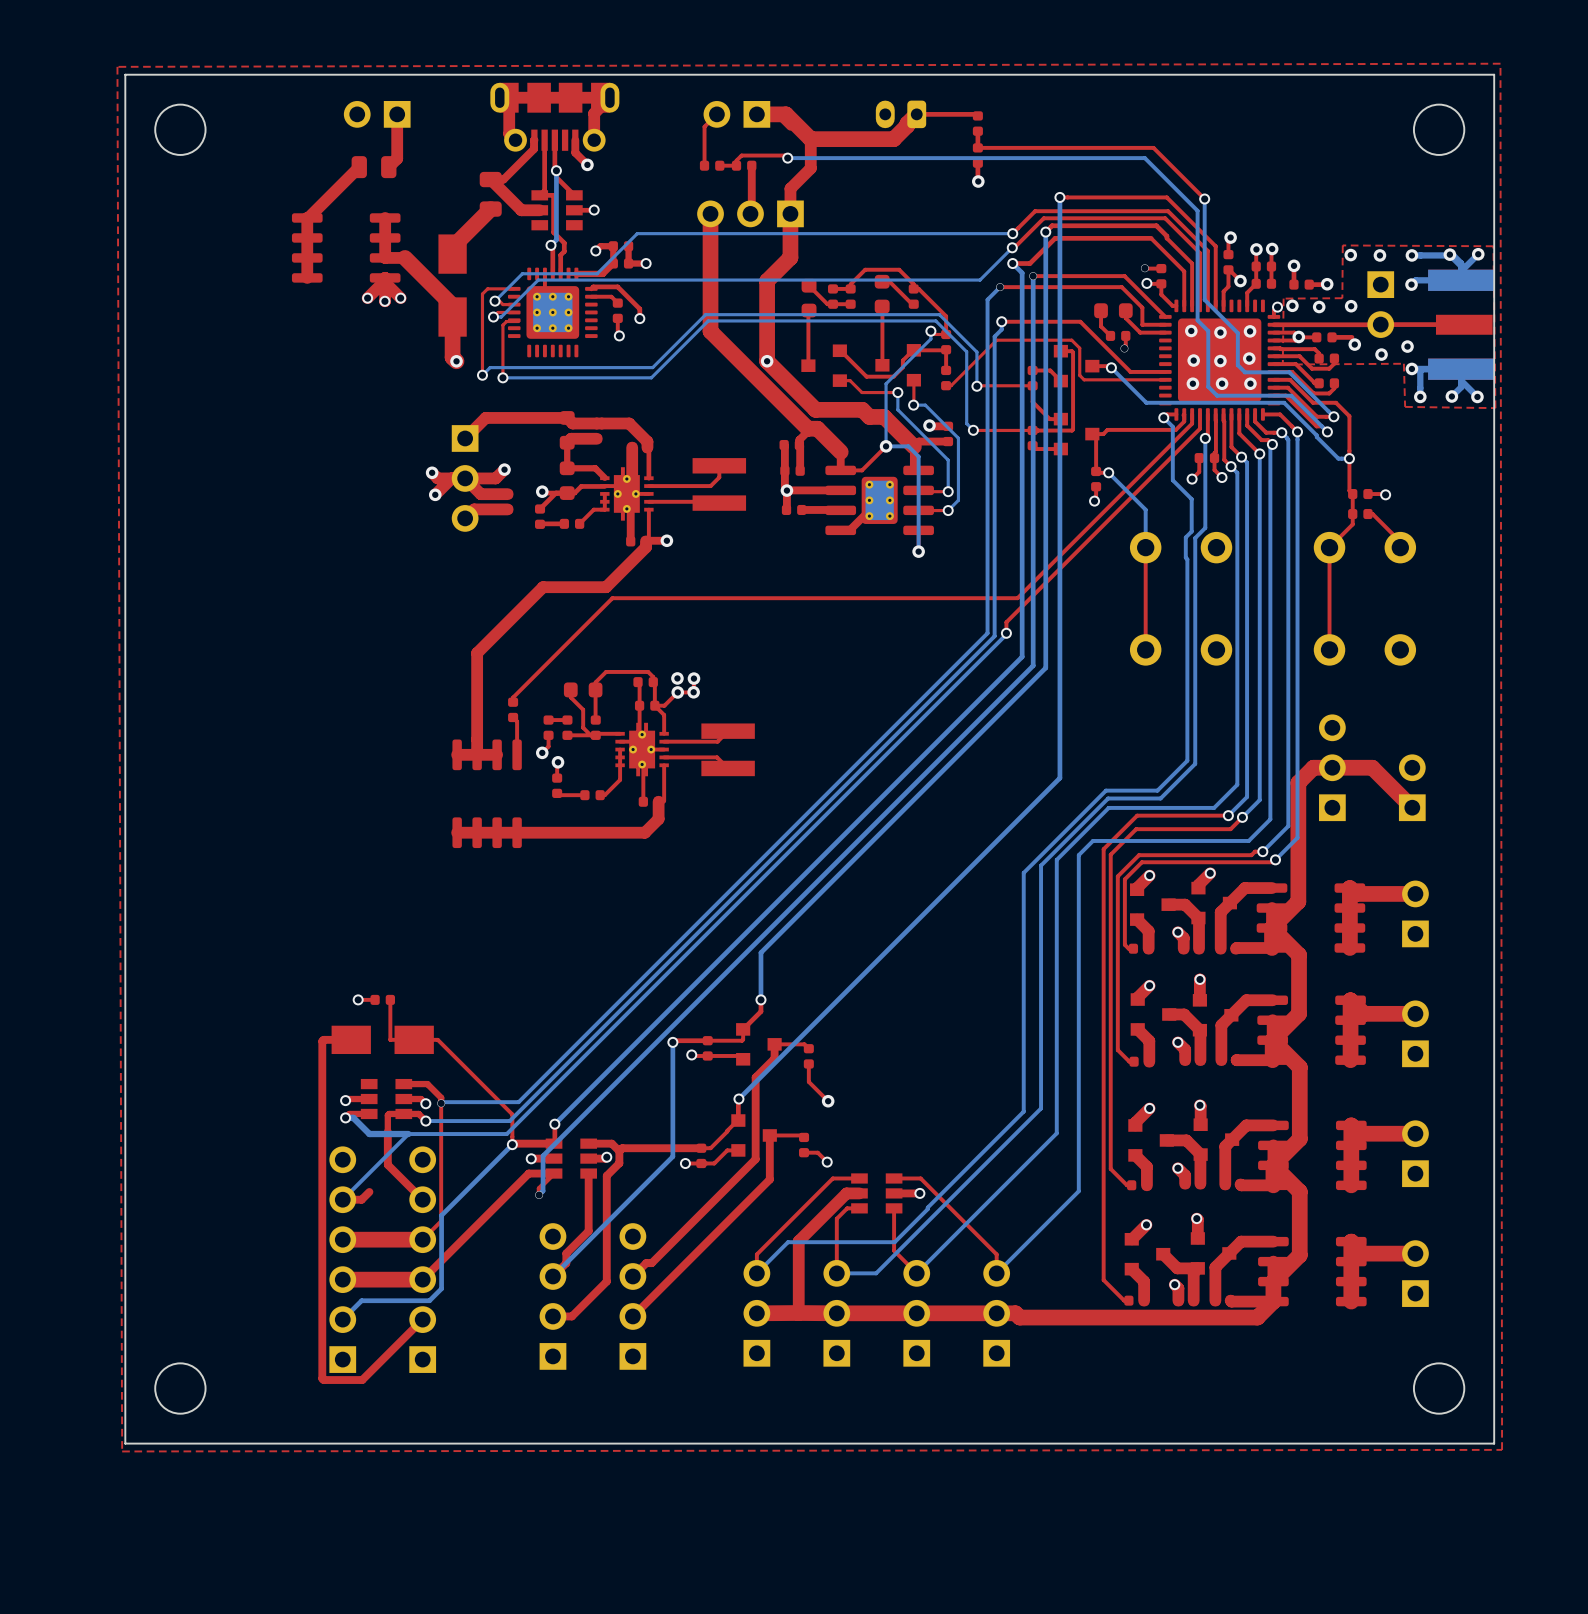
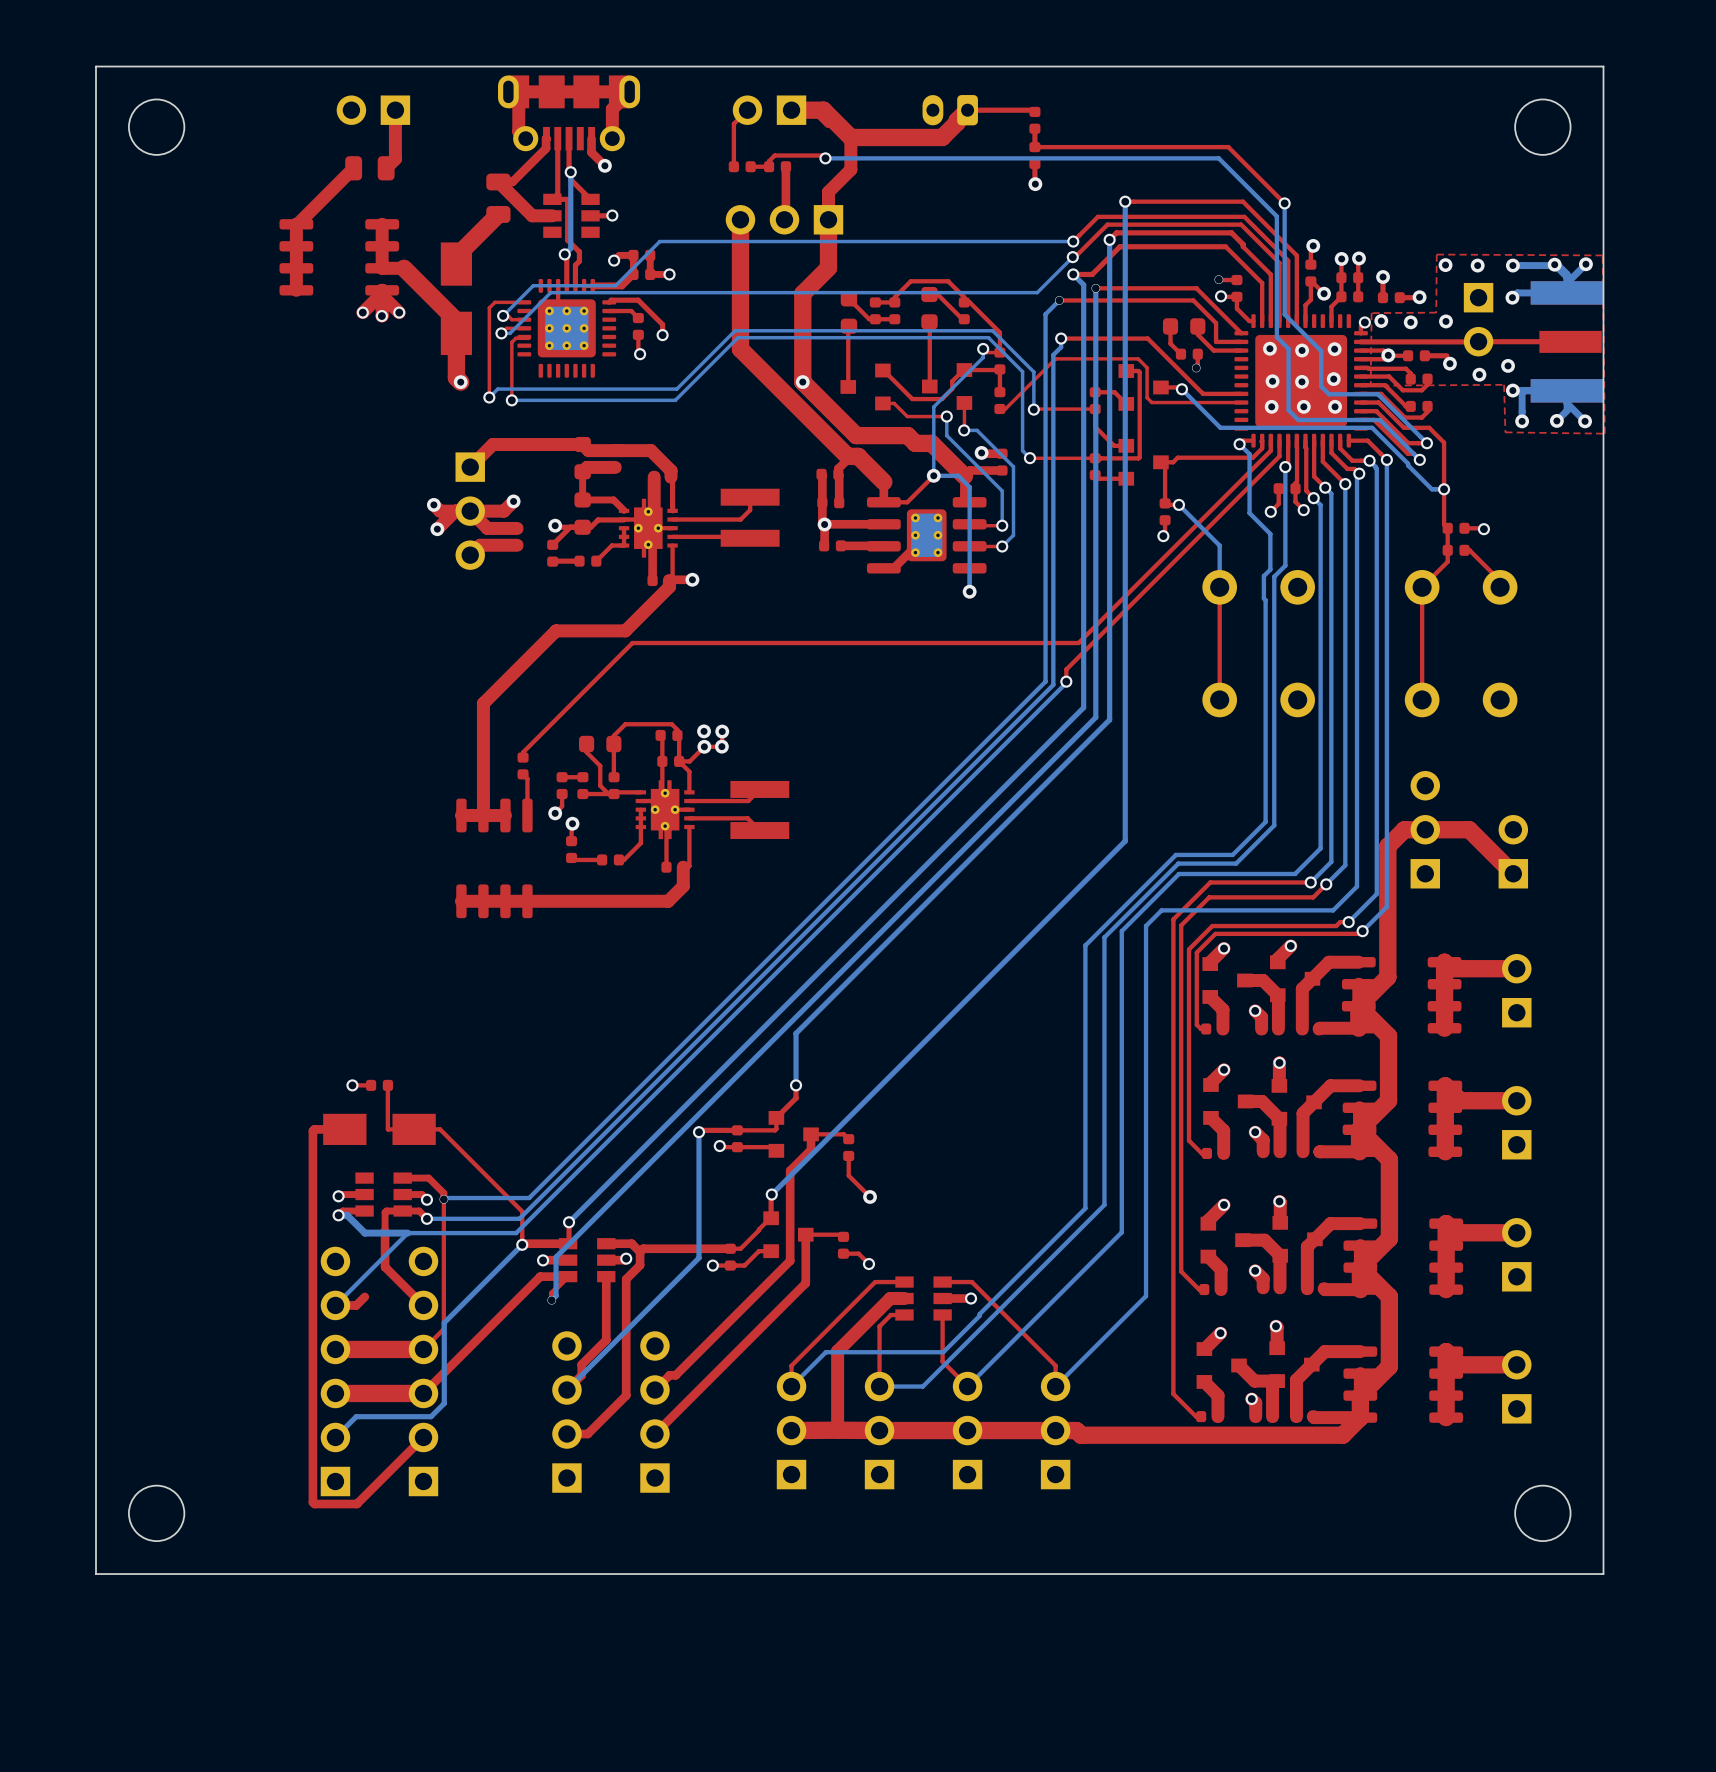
top zone outline: (1500, 63) (1502, 1449) (122, 1451) (117, 66) (1500, 63) -> none

